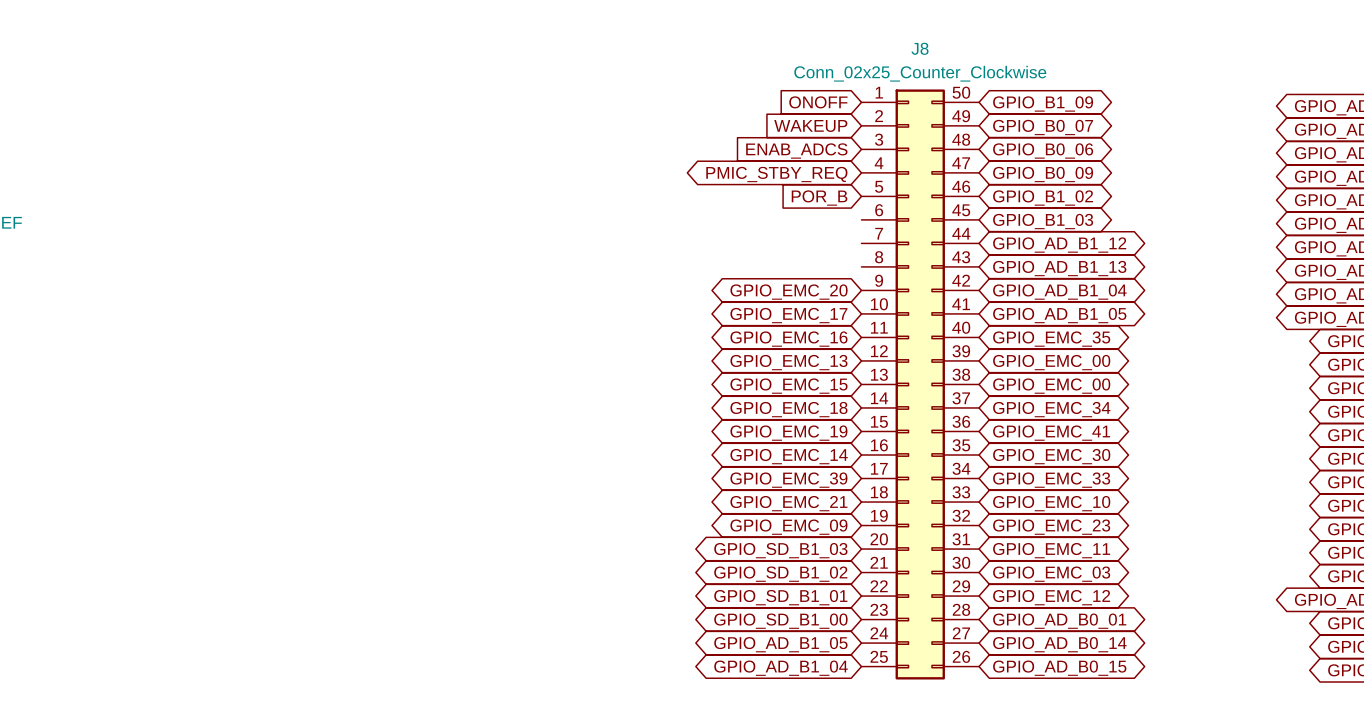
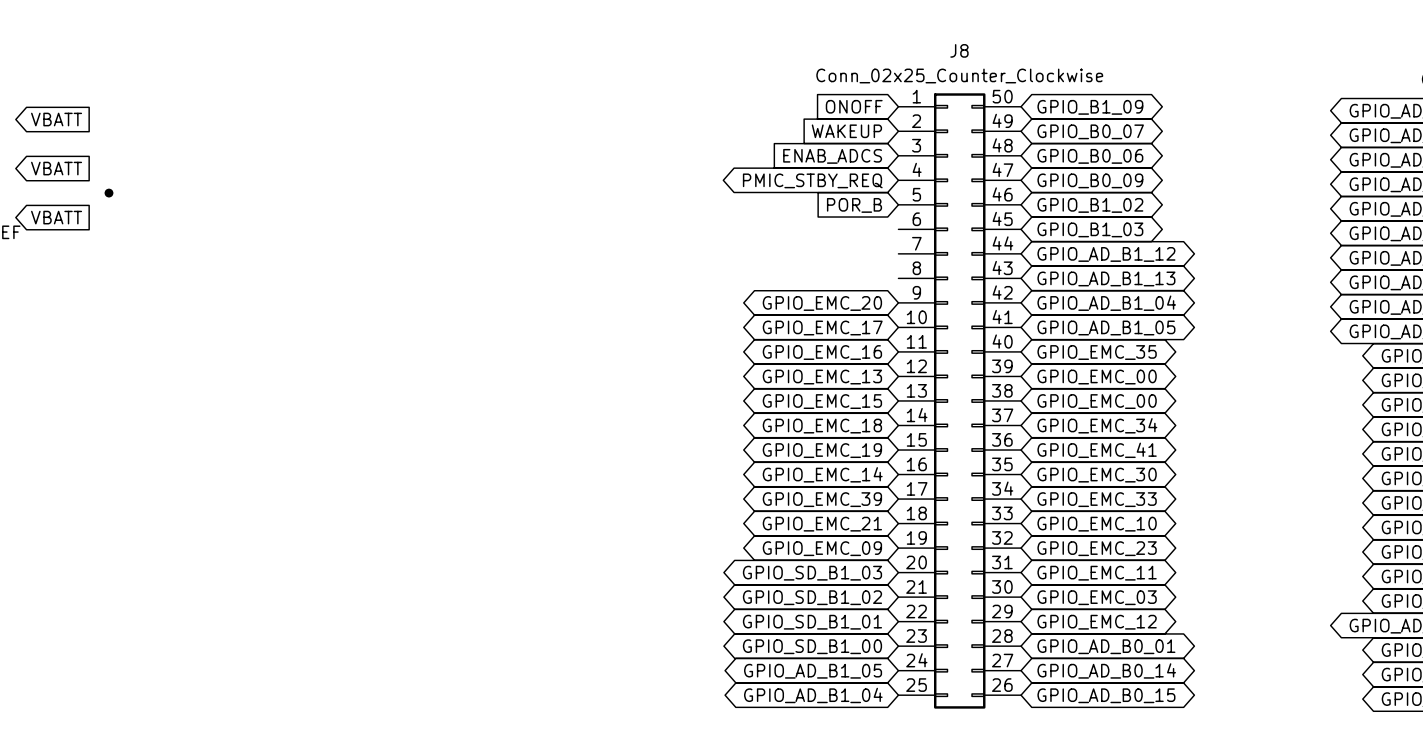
global label: none -> VBATT (56, 119)
global label: none -> VBATT (56, 168)
junction: none -> (108, 193)
global label: none -> VBATT (56, 217)

